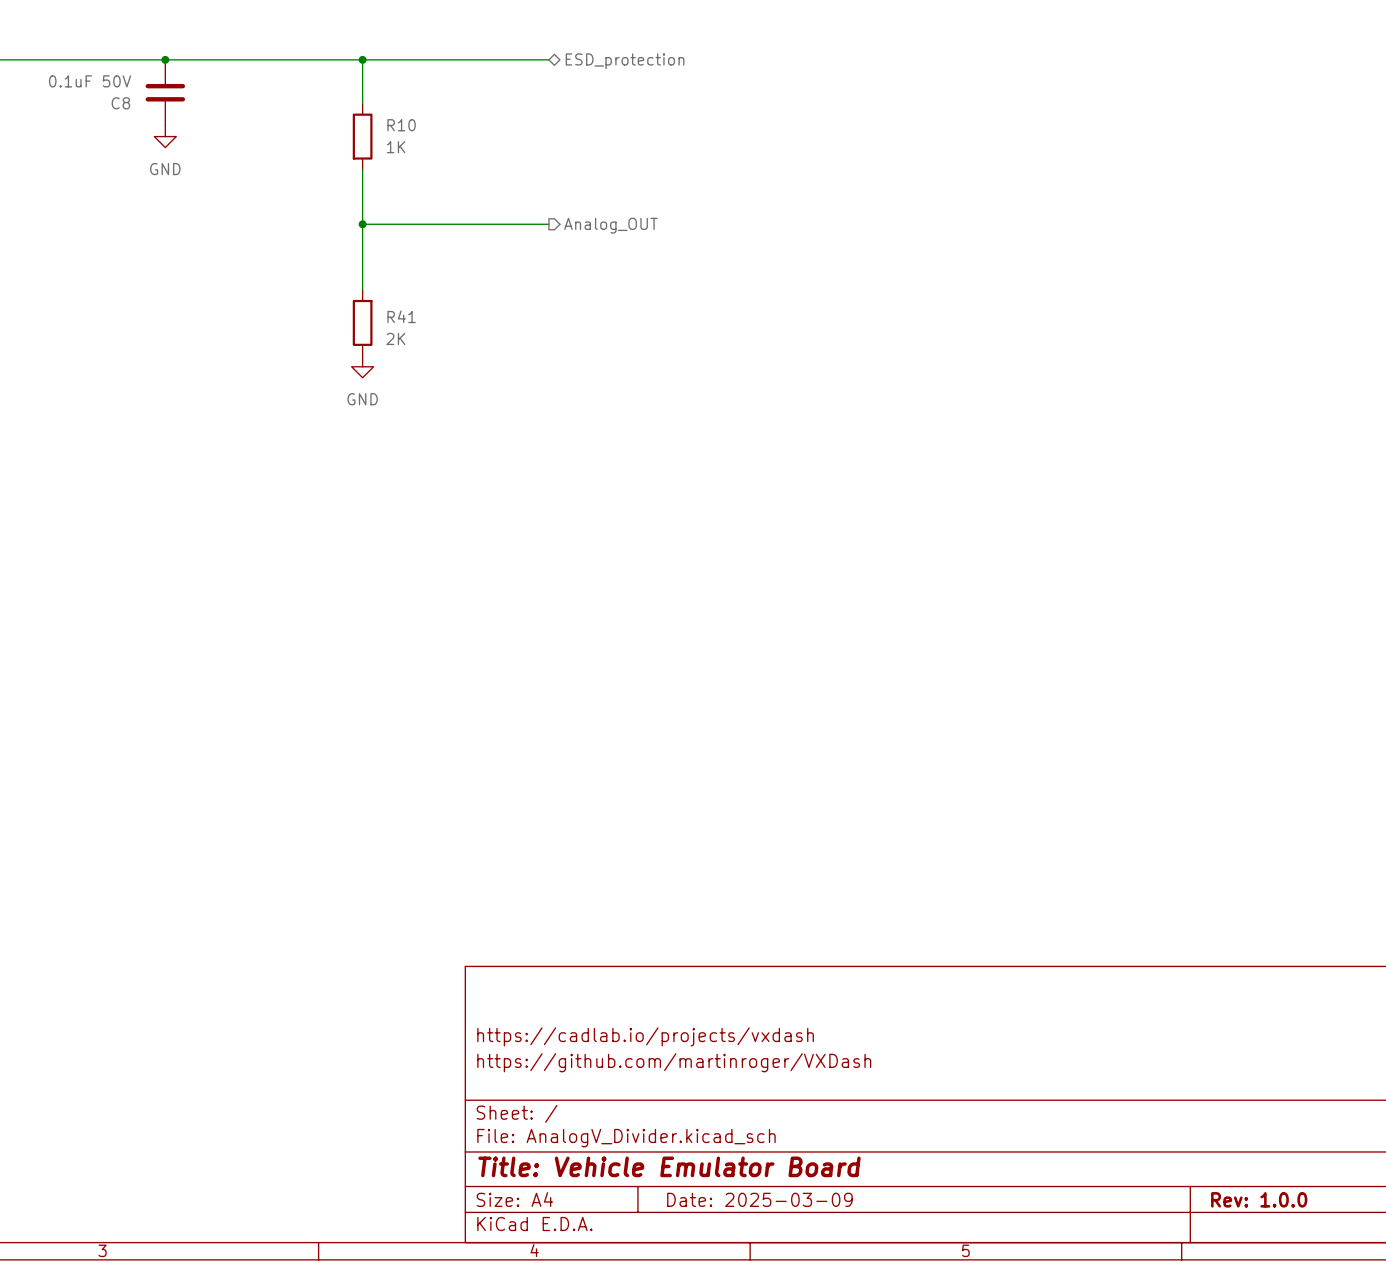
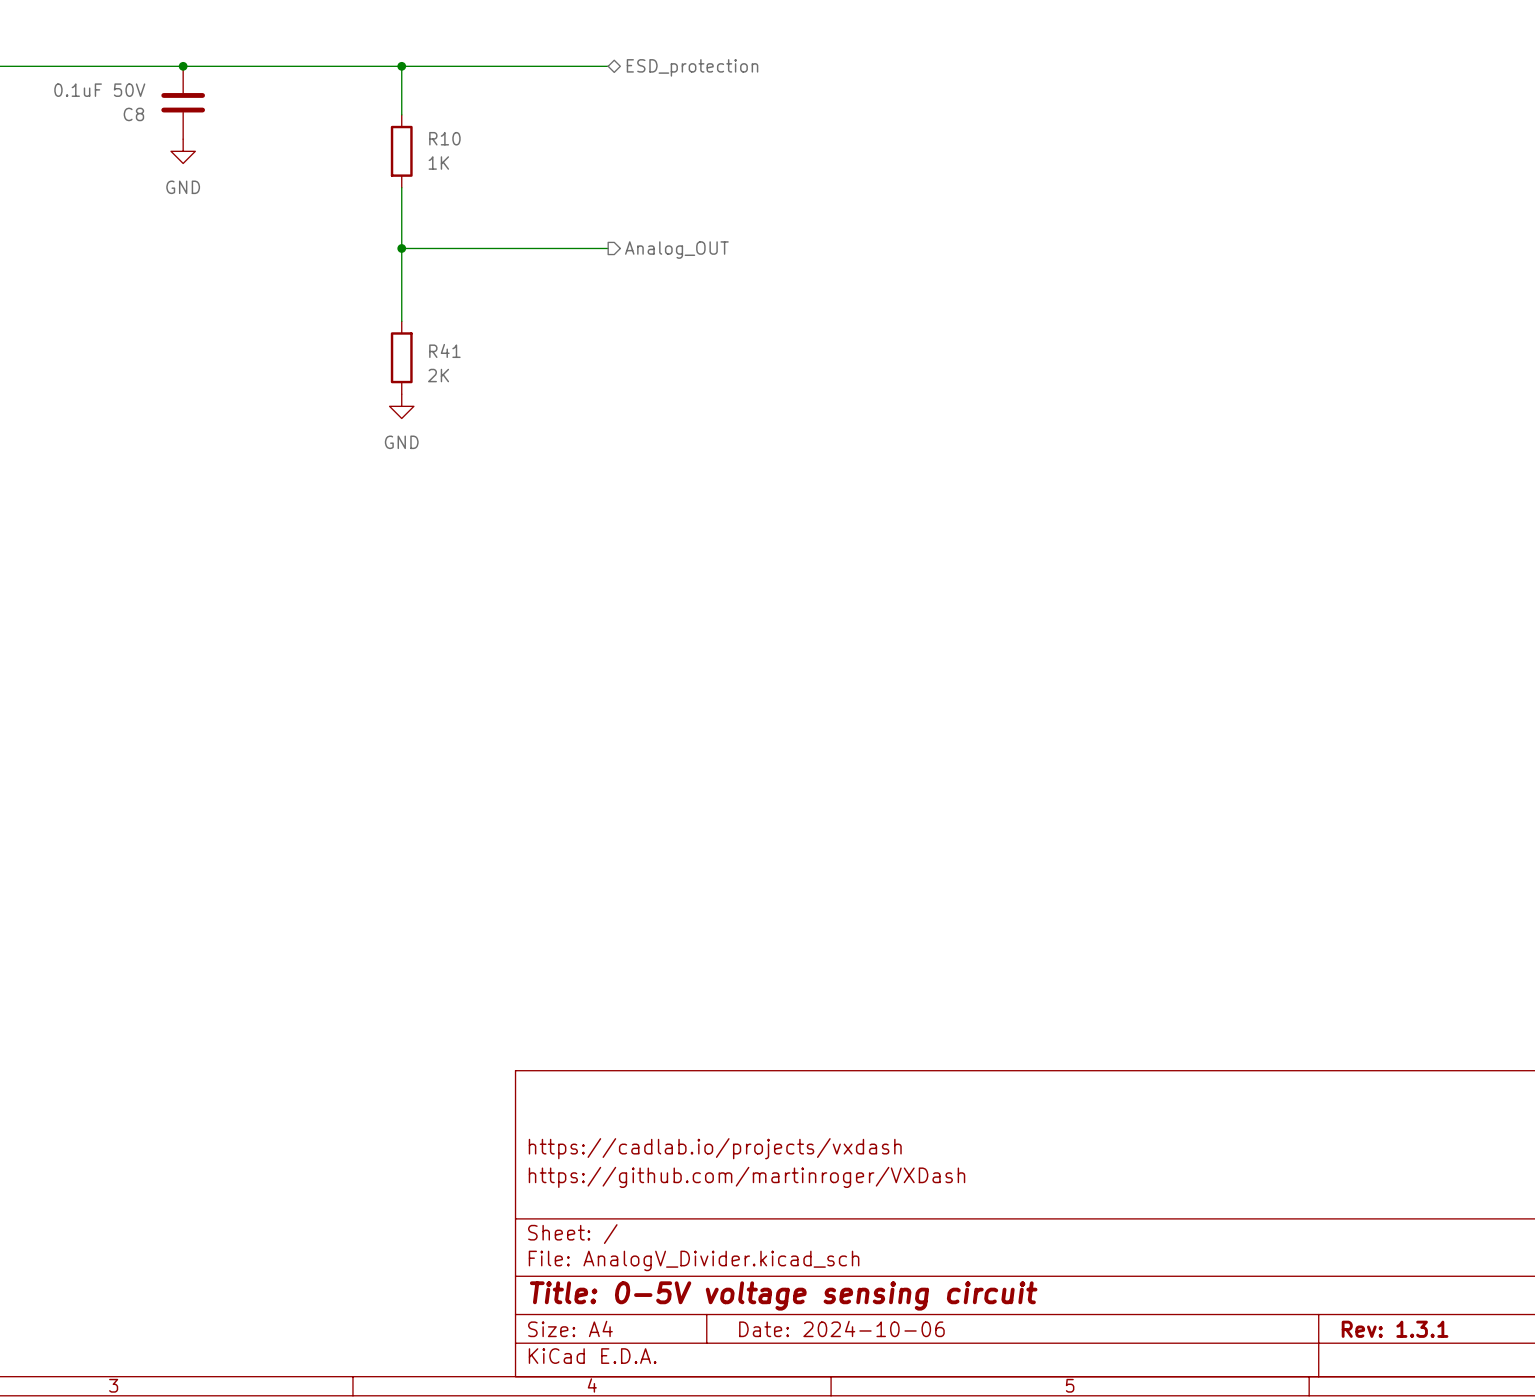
title block: Title: Vehicle Emulator Board (669, 1166) -> Title: 0-5V voltage sensing circuit (783, 1295)
title block: Date: 2025-03-09 (759, 1199) -> Date: 2024-10-06 (841, 1328)
title block: Rev: 1.0.0 (1259, 1199) -> Rev: 1.3.1 (1395, 1329)

